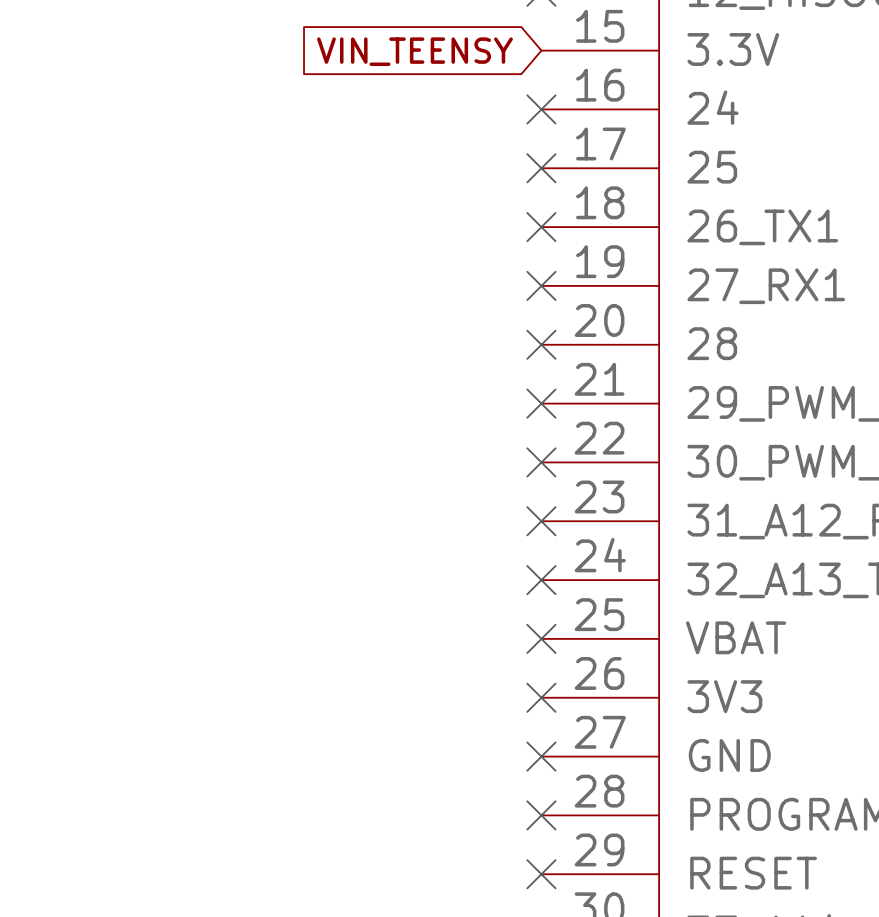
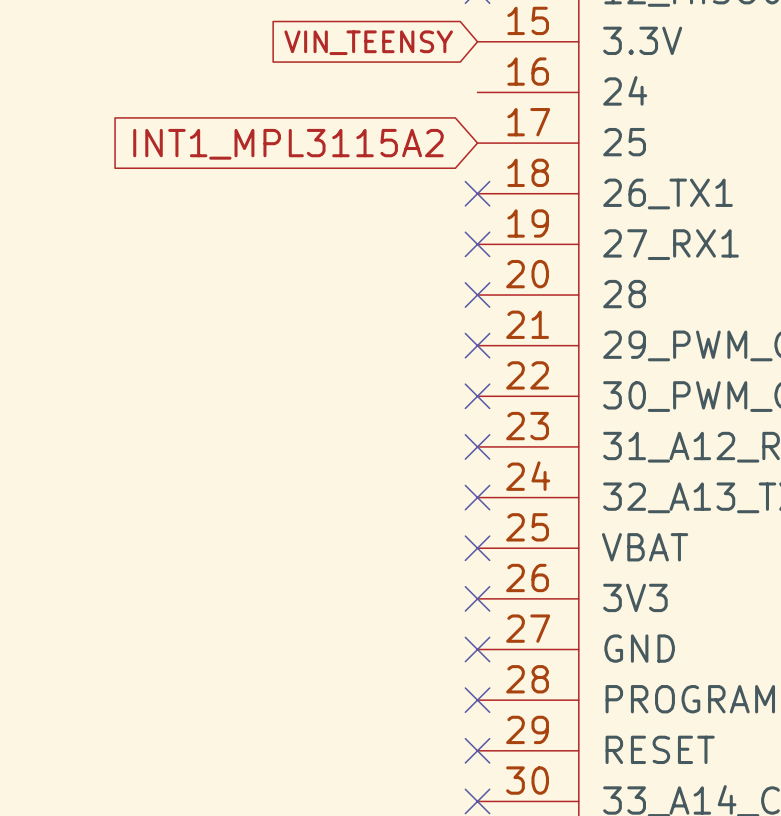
no-connect mark: (541, 109) -> none
no-connect mark: (541, 168) -> none
global label: none -> INT1_MPL3115A2 (288, 144)

